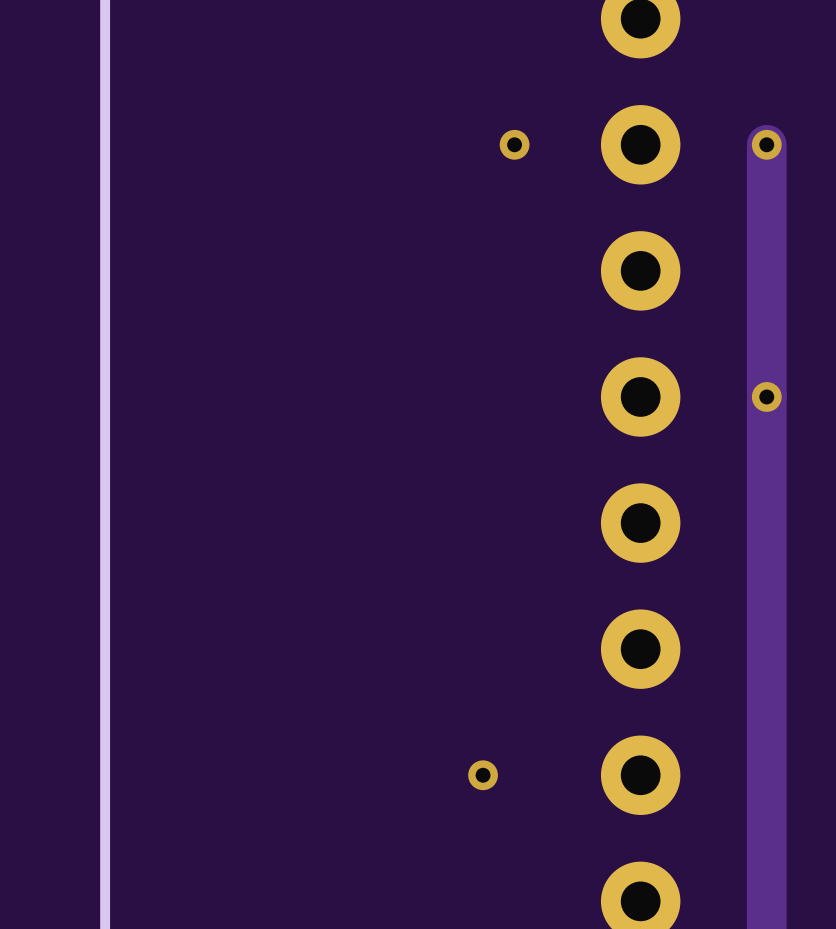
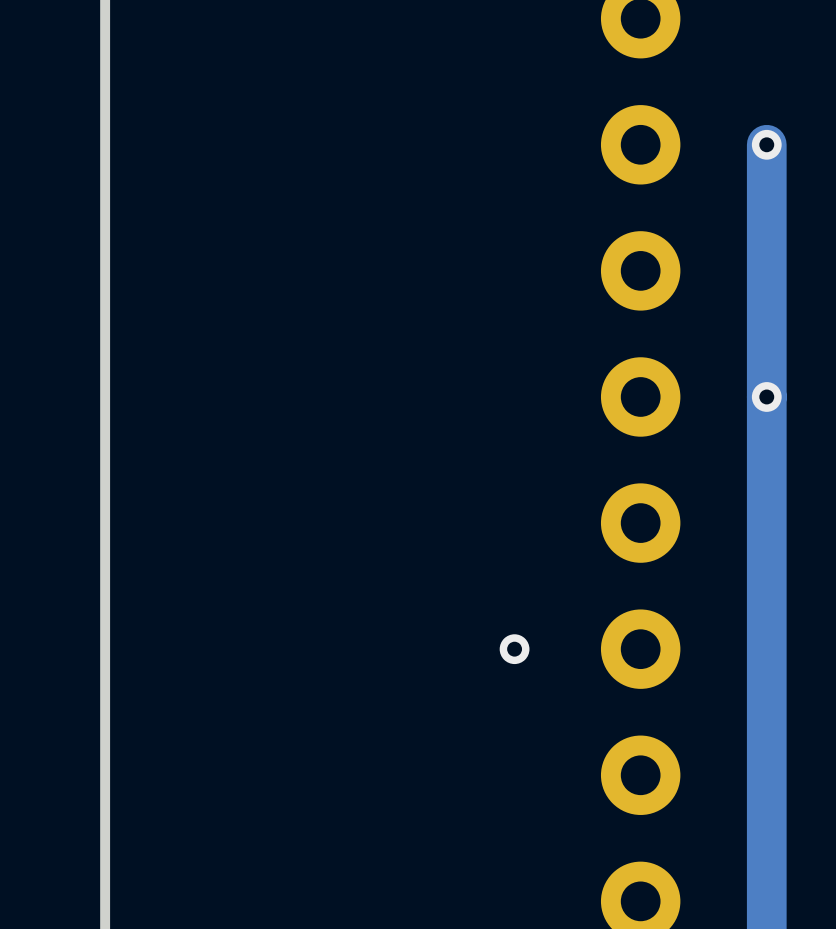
via: (514, 144) -> none
via position: (483, 775) -> (514, 649)

